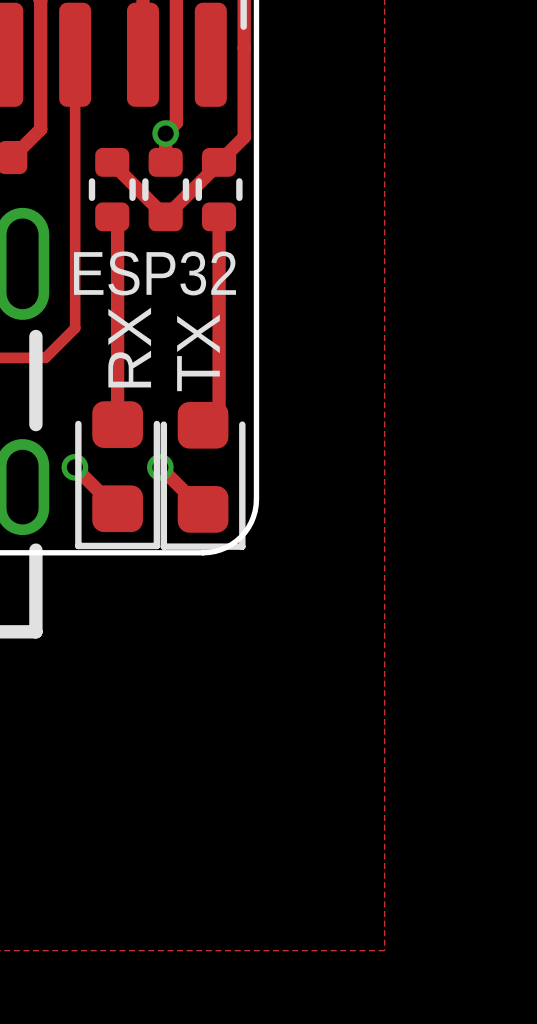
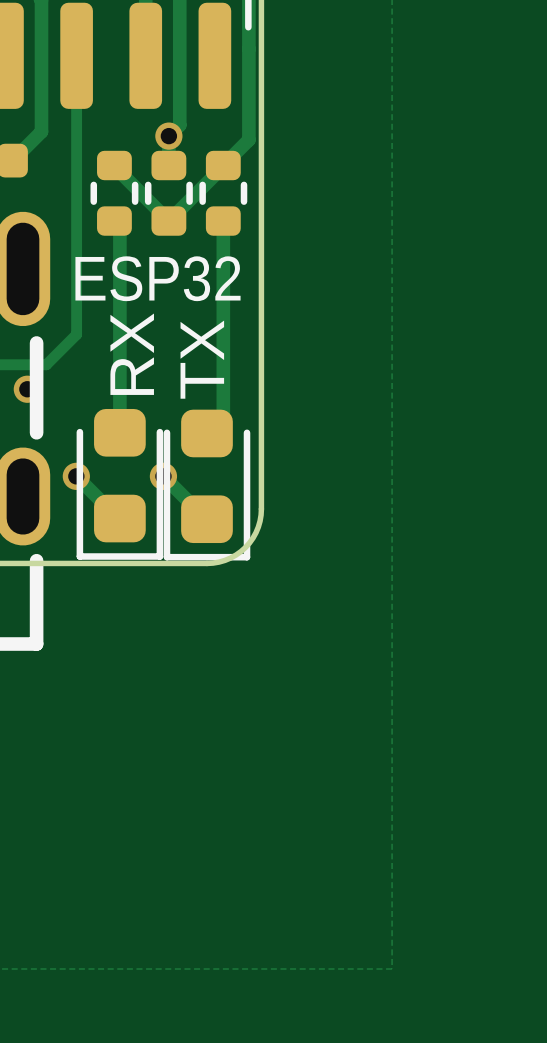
via: none -> (27, 389)

